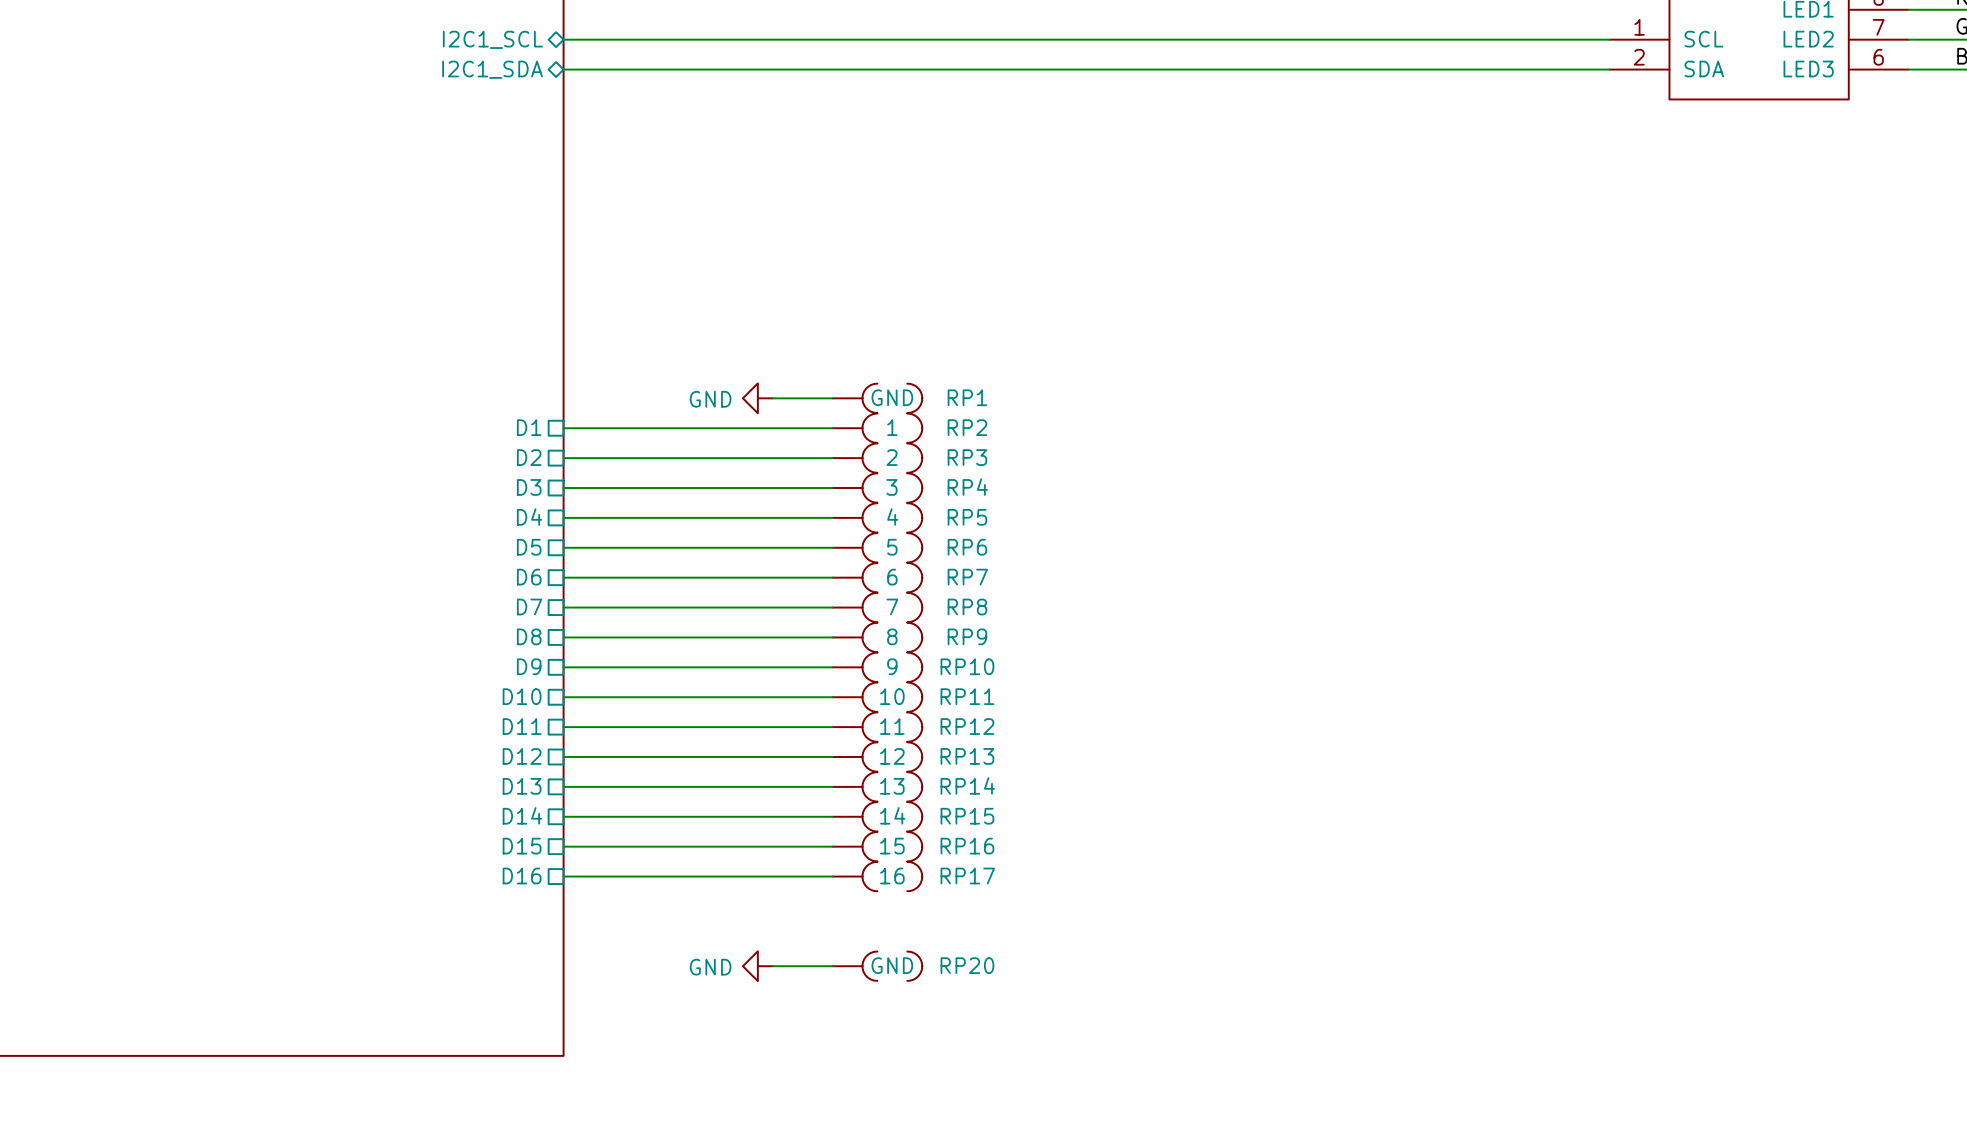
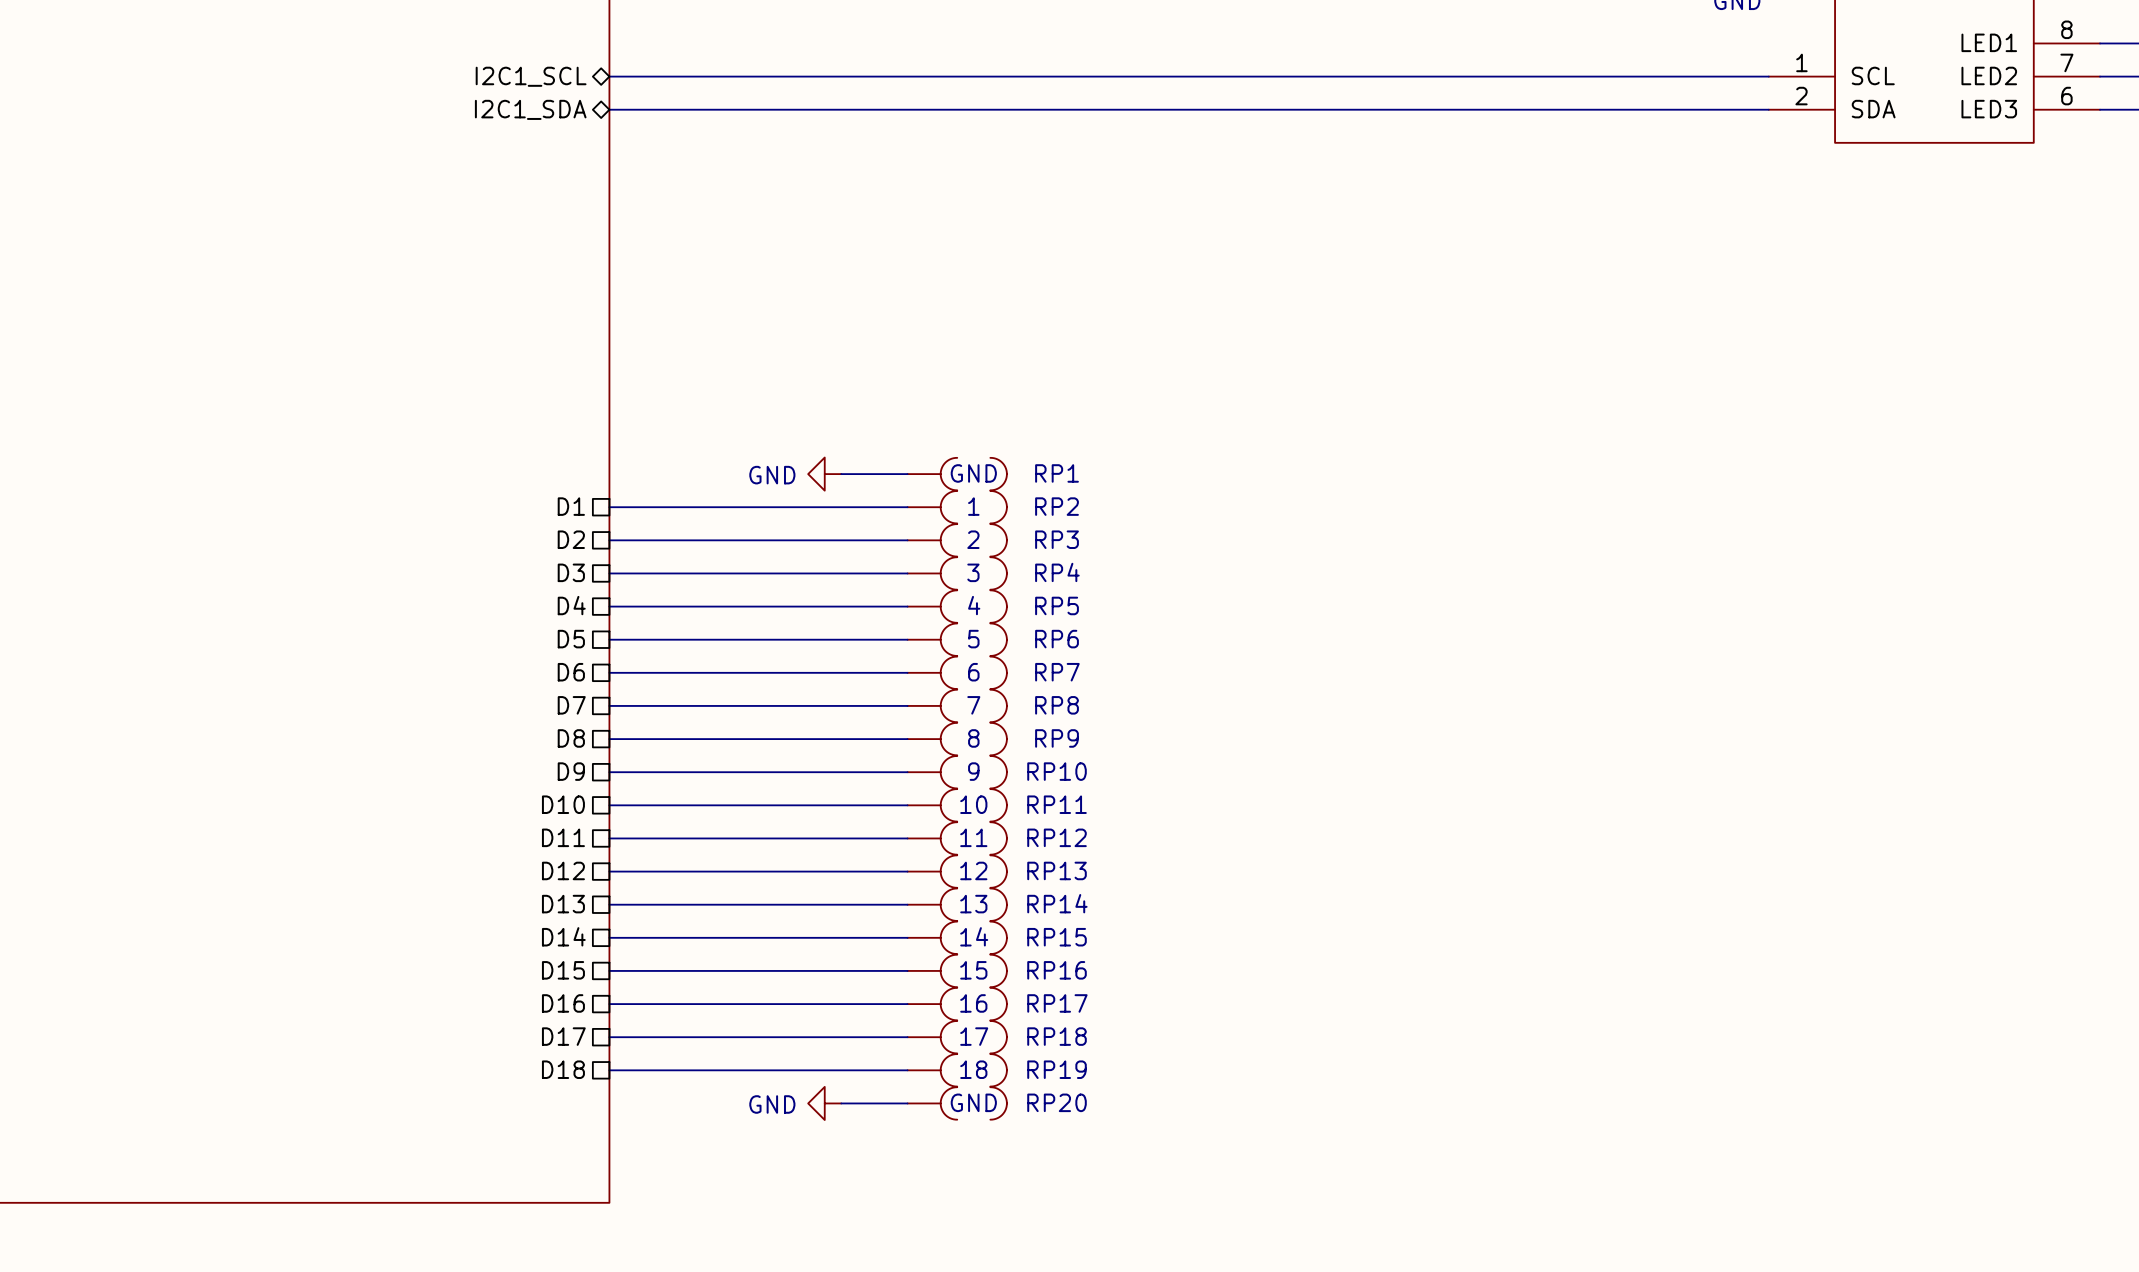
sheet pin: none -> D17 (563, 1036)
wire: none -> (609, 1037) (907, 1037)
RP18: none -> 17 (957, 1037)
sheet pin: none -> D18 (563, 1069)
wire: none -> (609, 1070) (907, 1070)
RP19: none -> 18 (957, 1070)

